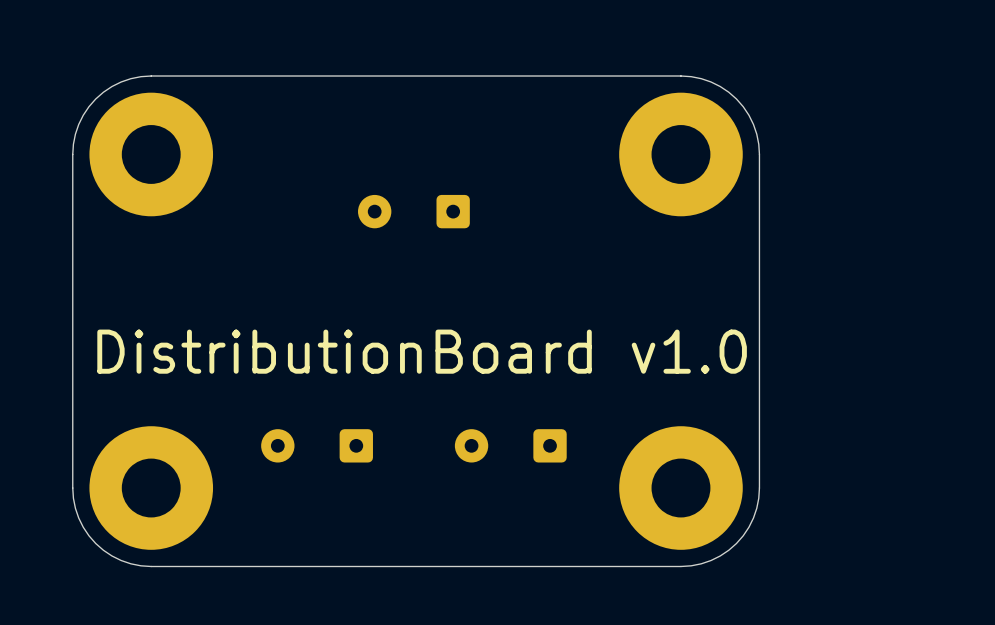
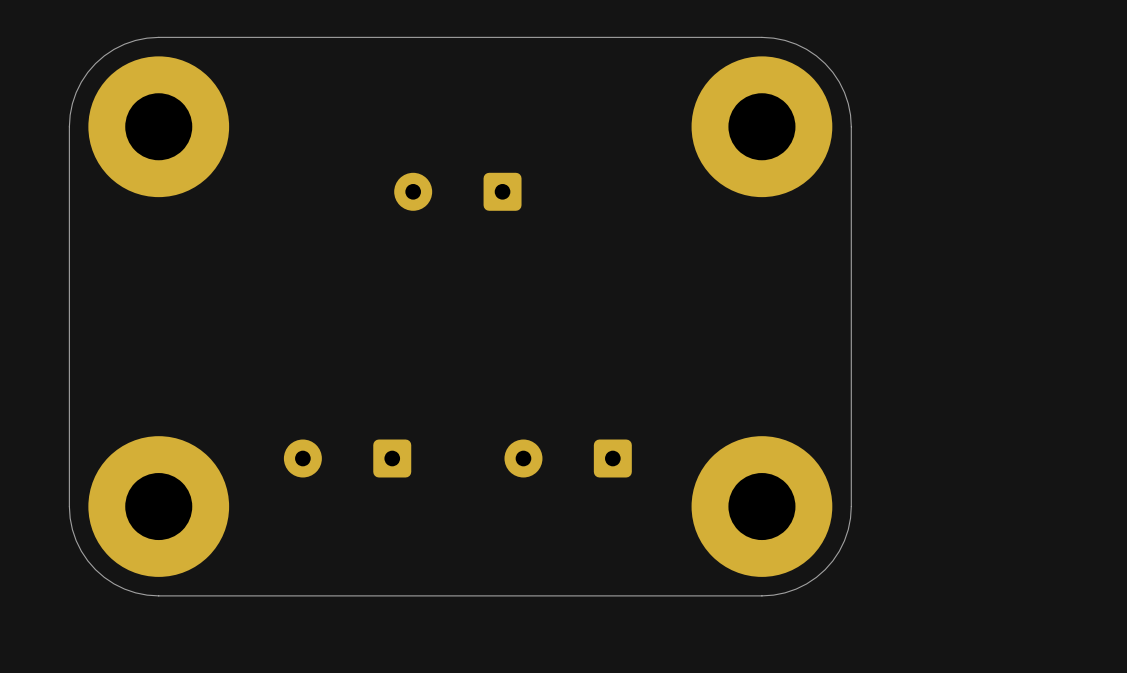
text: DistributionBoard v1.0 (422, 351) -> none

